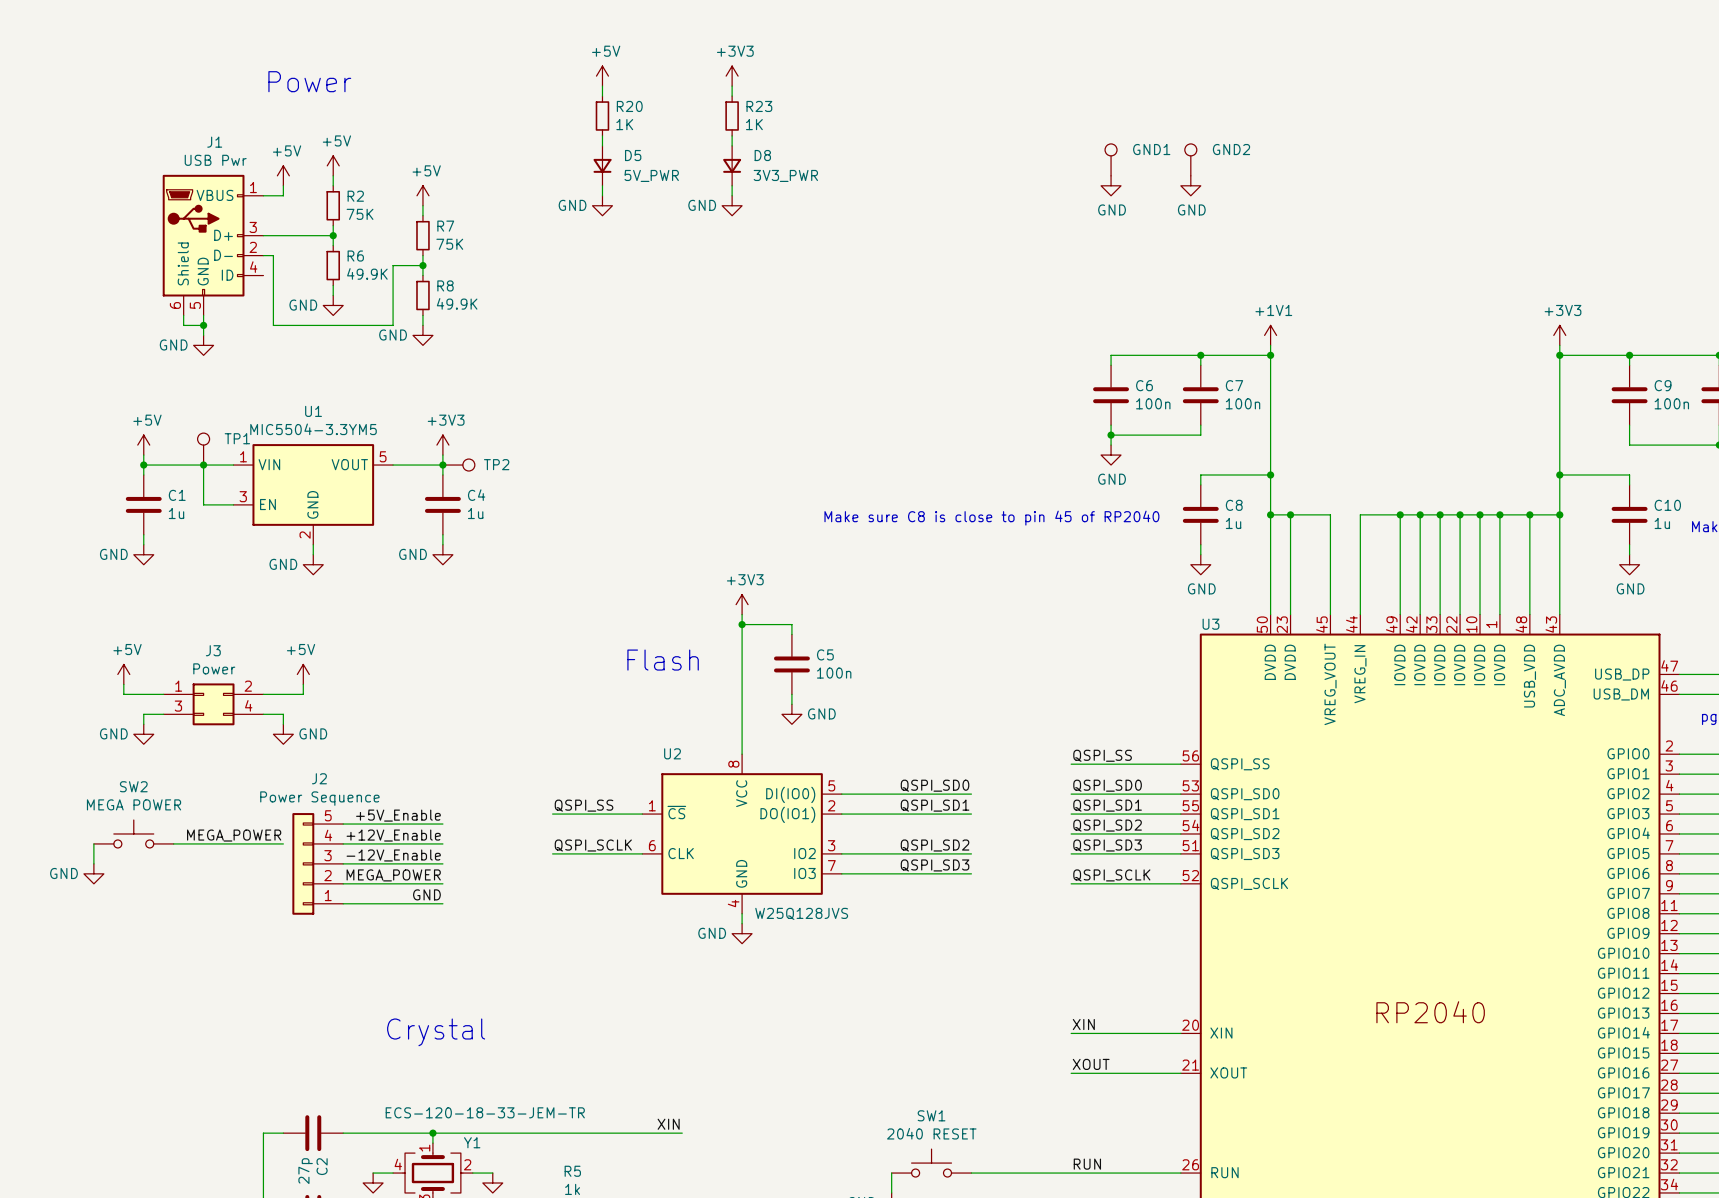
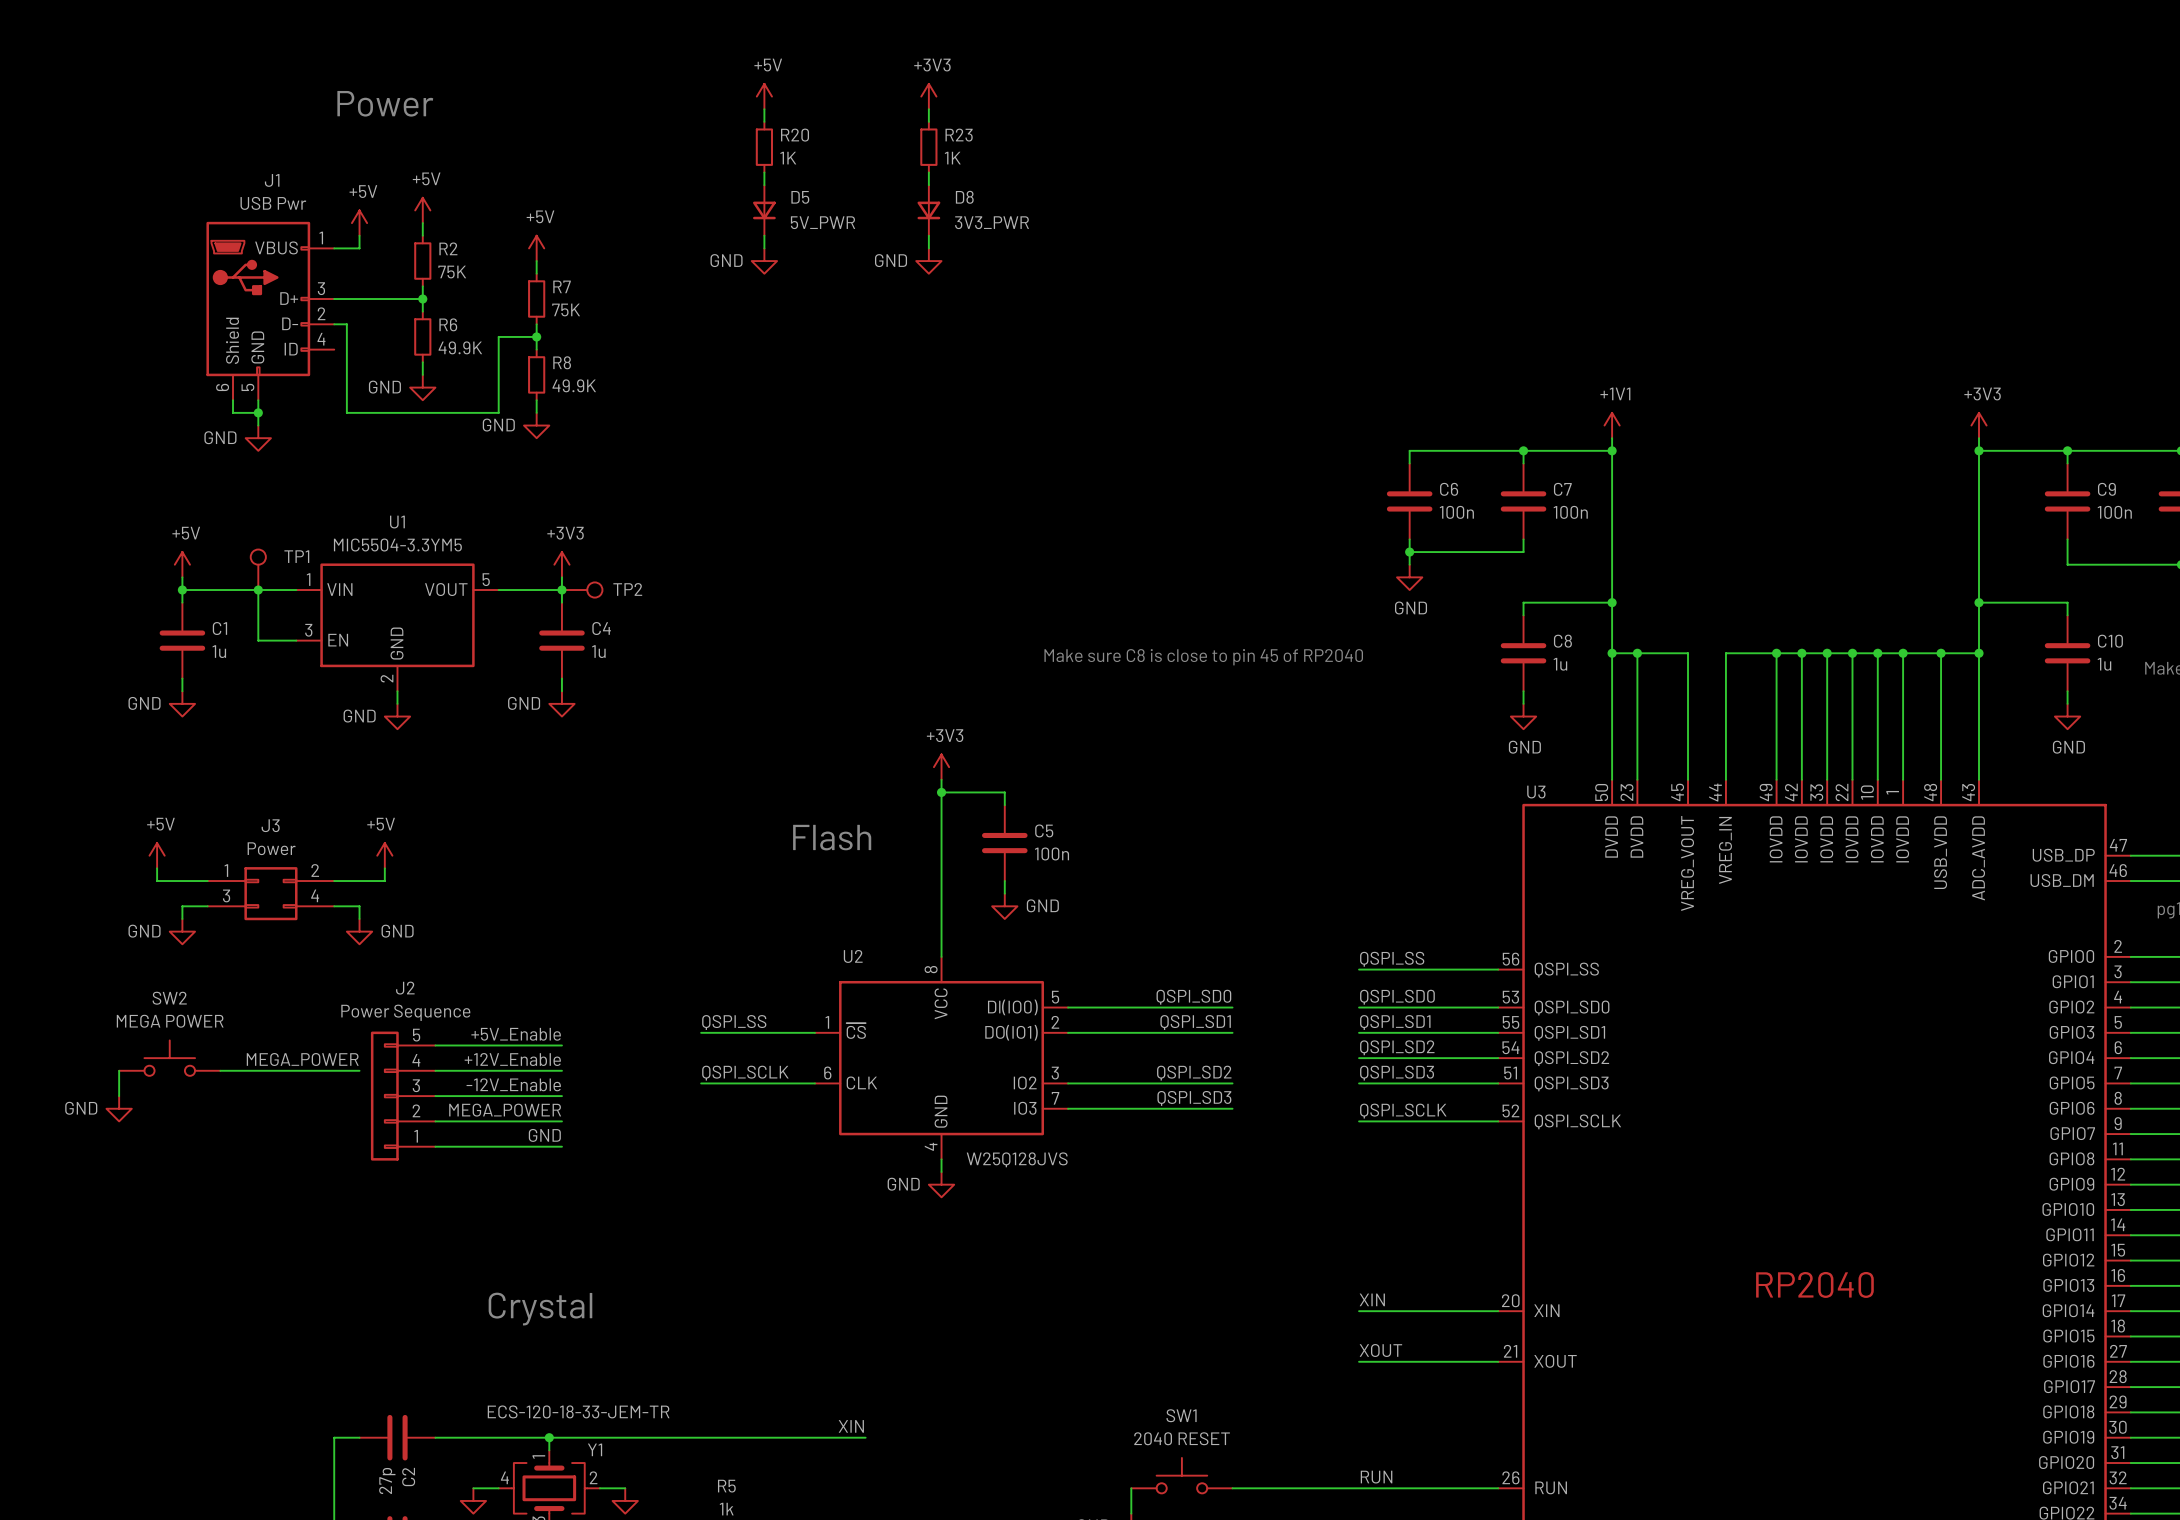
GND1: (1111, 159) -> none
GND2: (1190, 159) -> none
power symbol: GND (1111, 185) -> none
power symbol: GND (1190, 185) -> none

